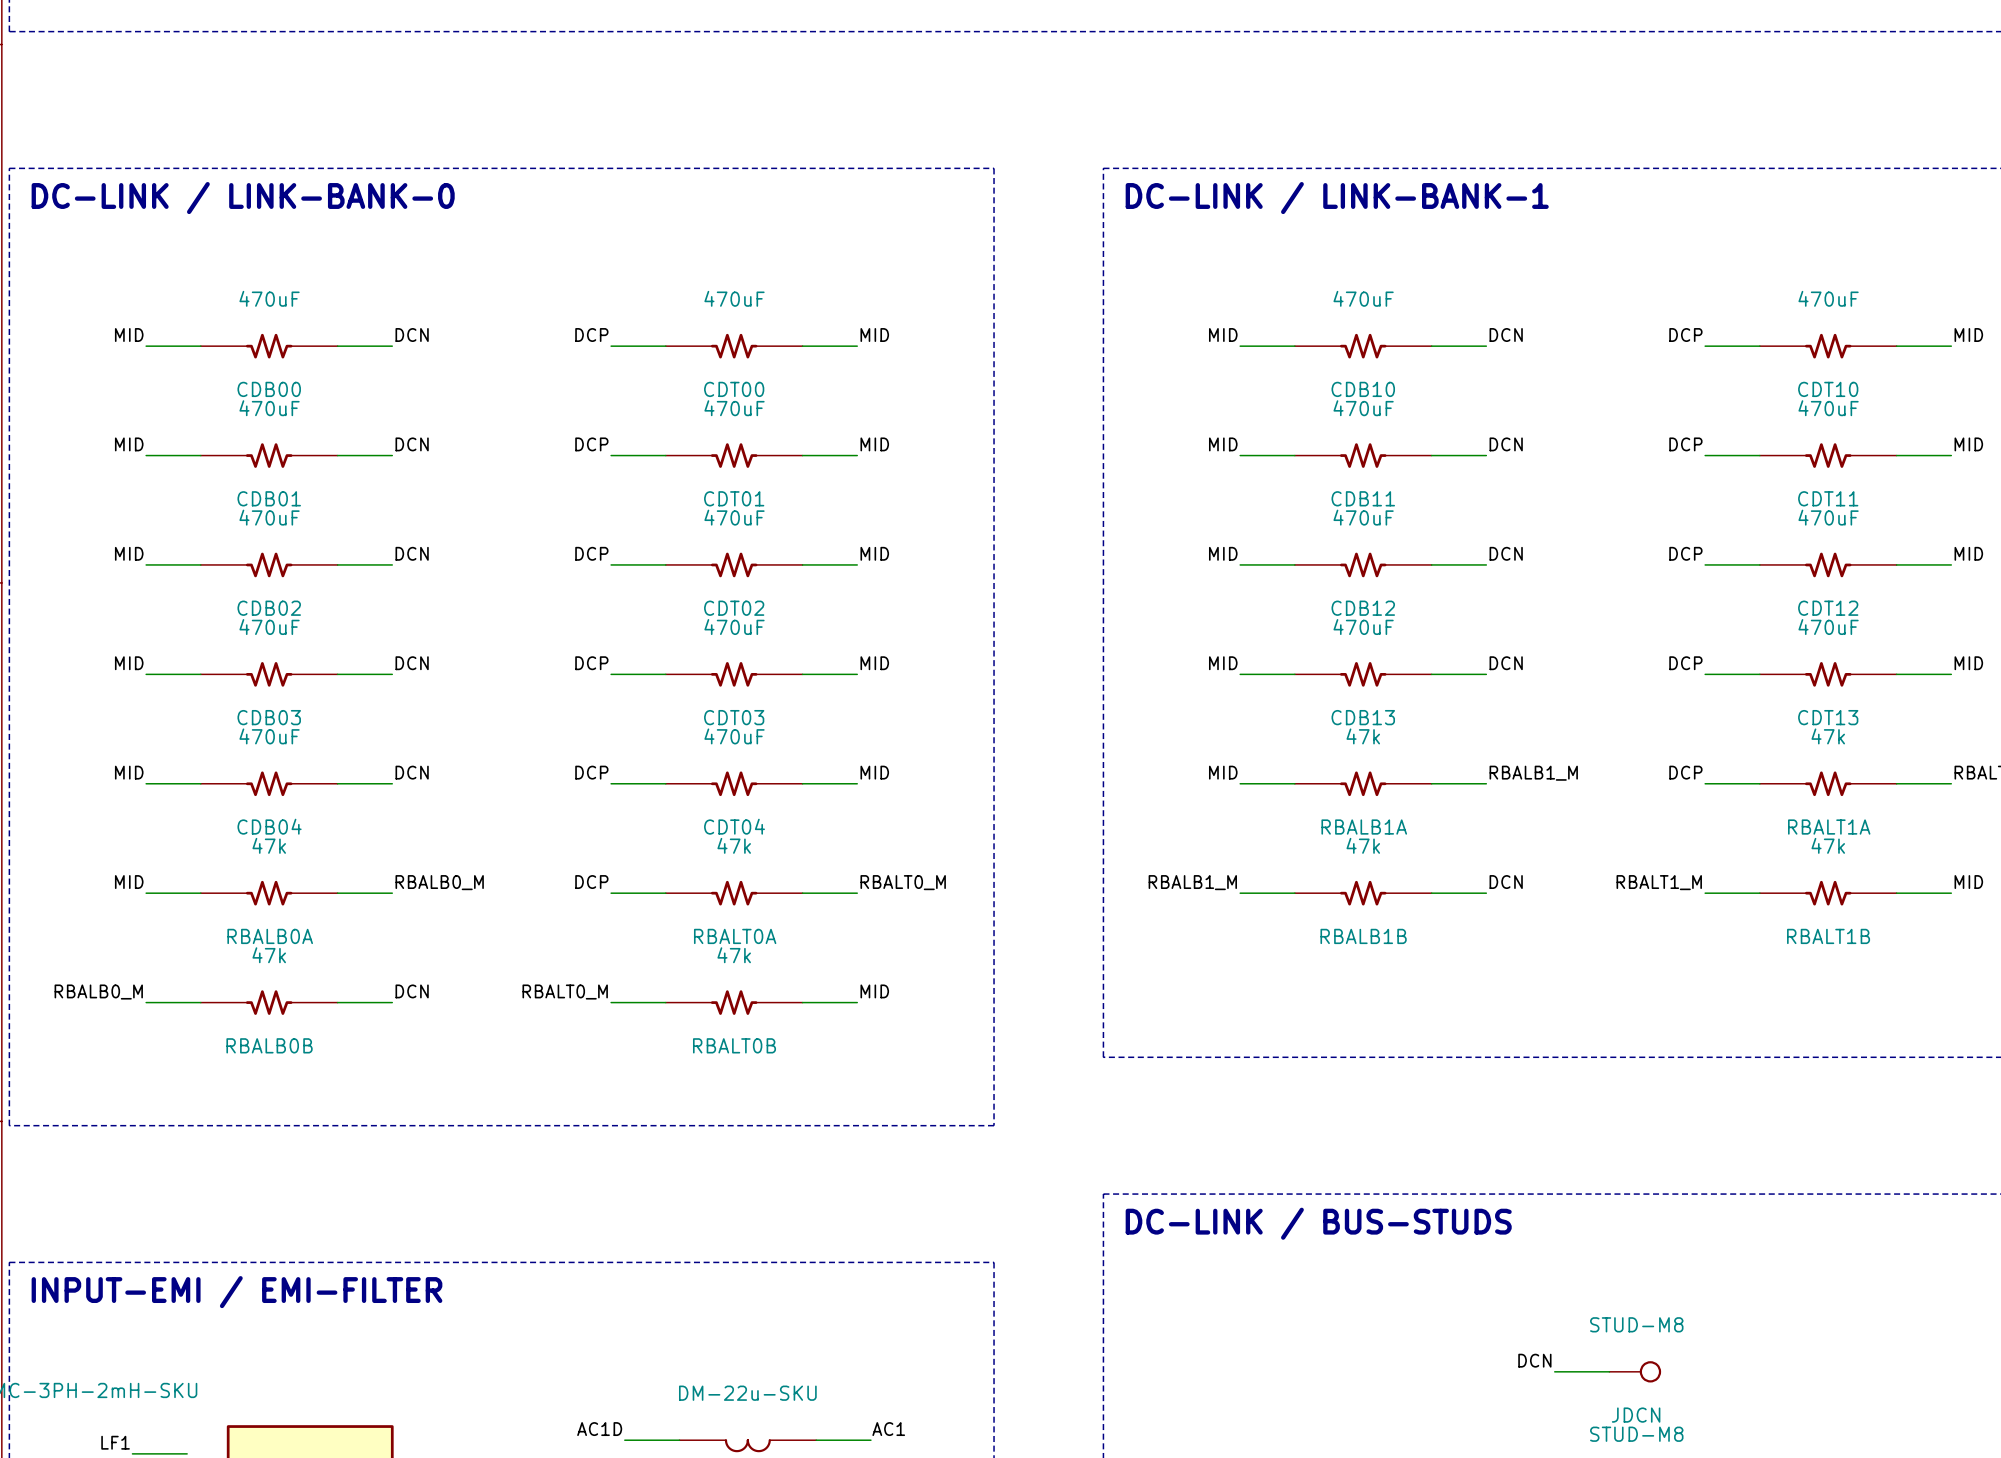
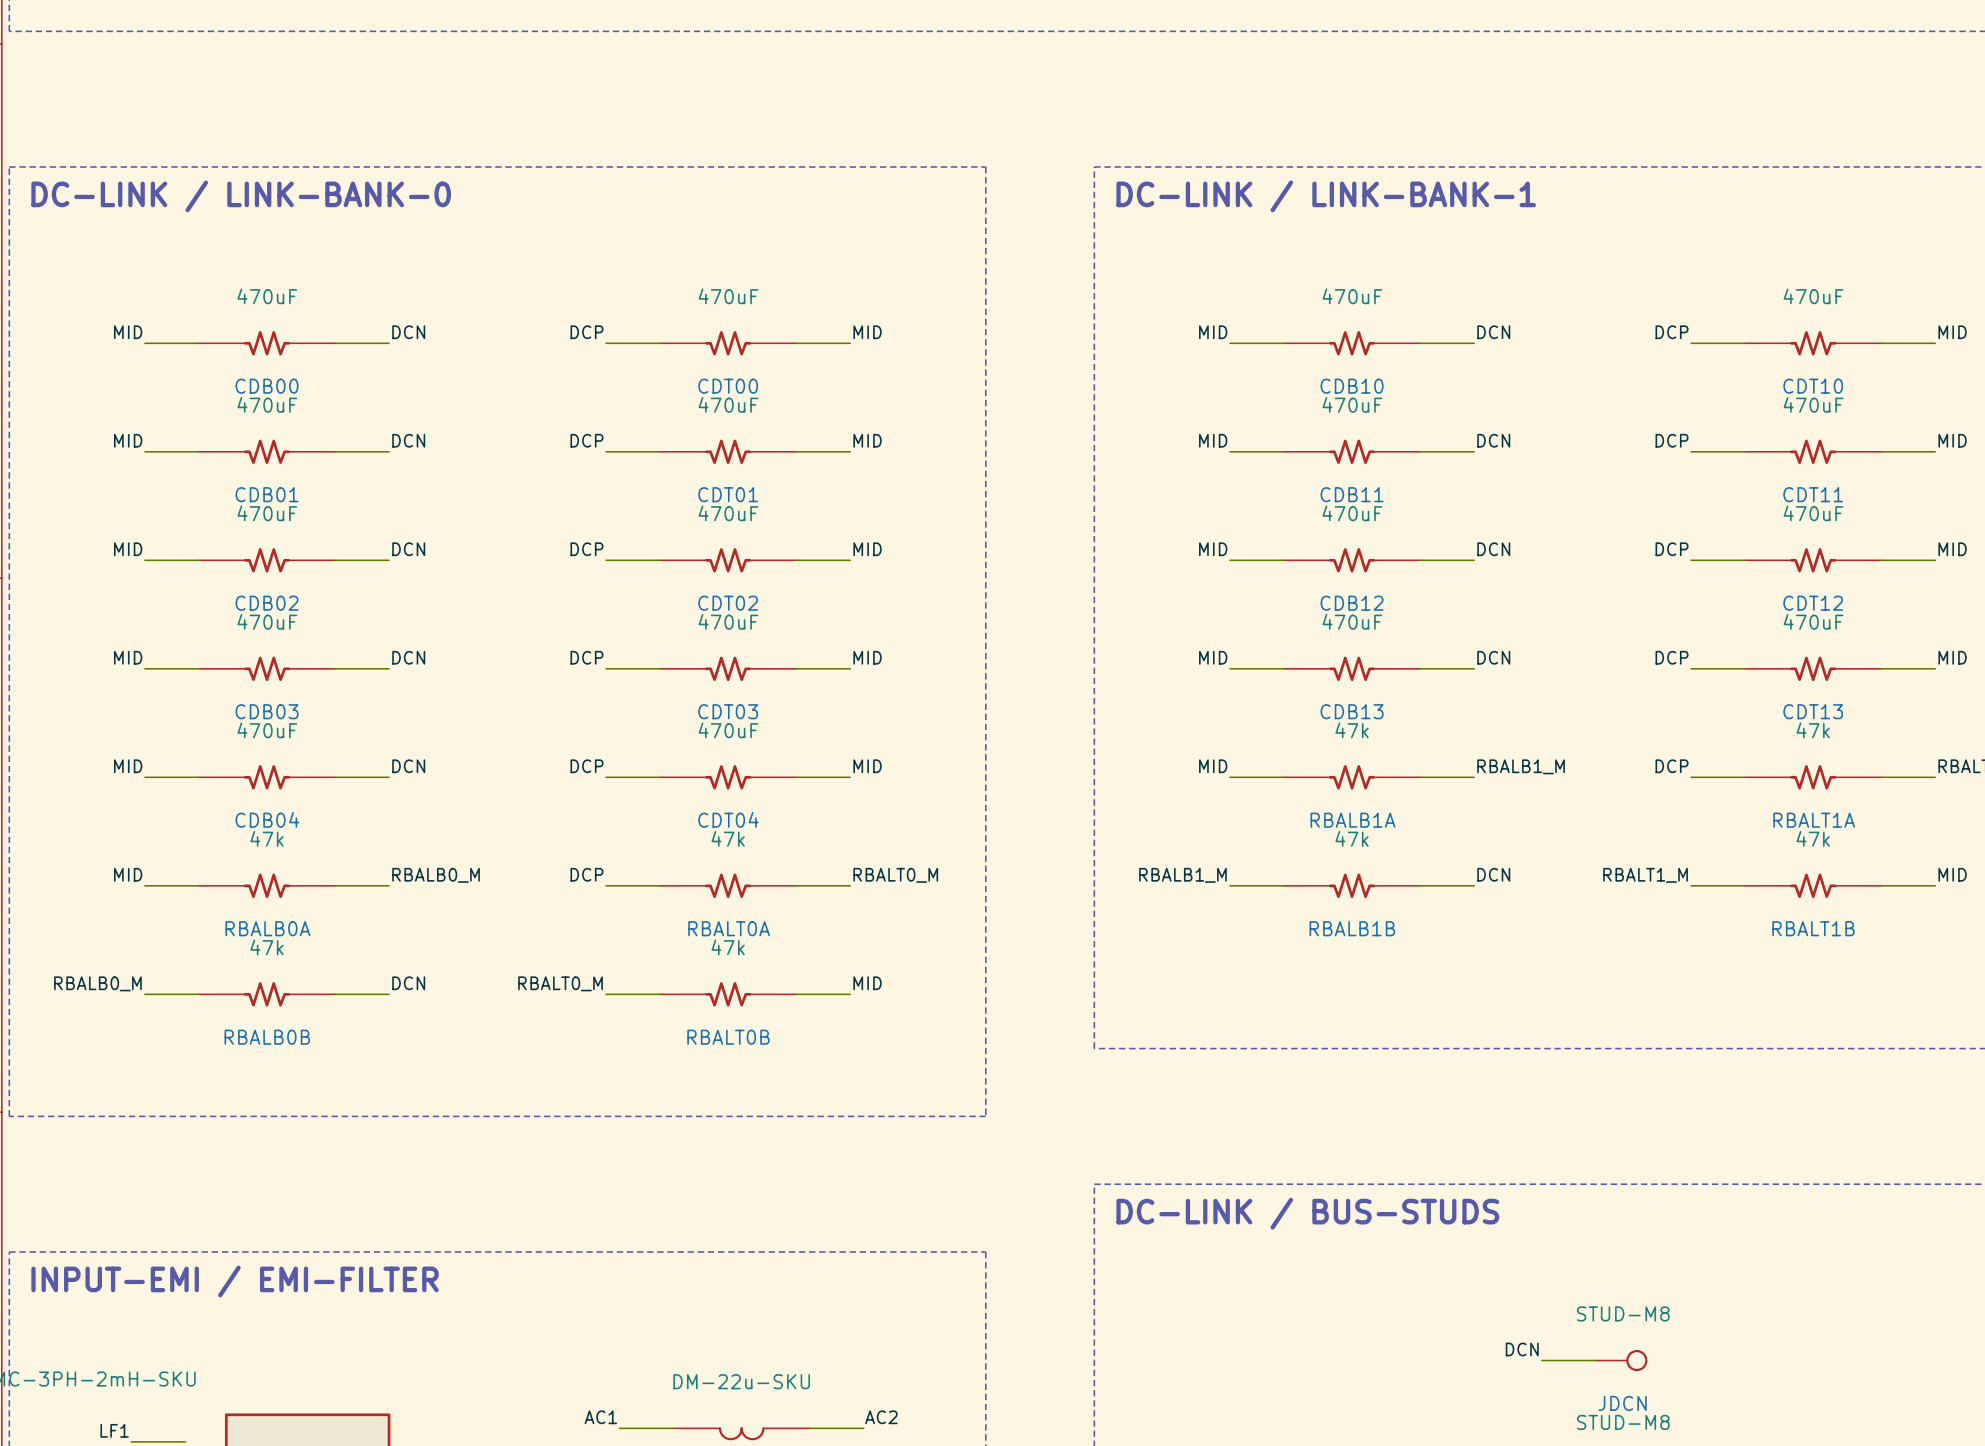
label: AC1D (599, 1429) -> AC1 (600, 1417)
label: AC1 (888, 1429) -> AC2 (881, 1417)

